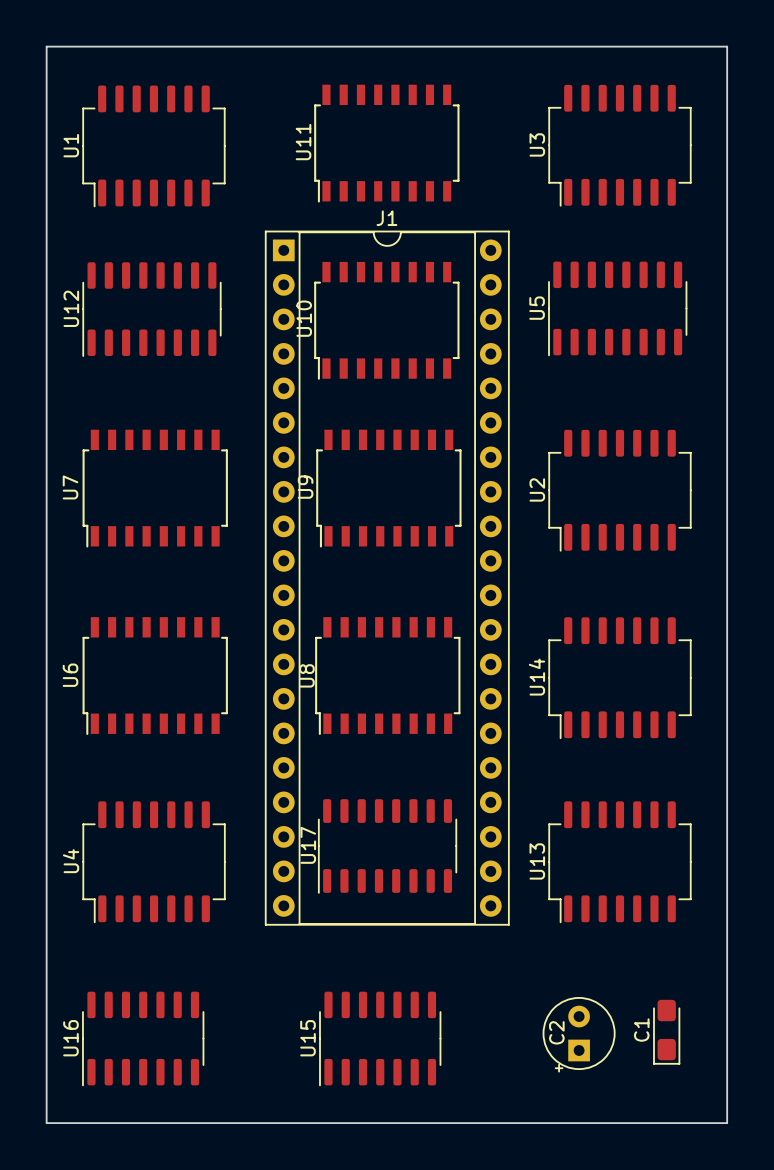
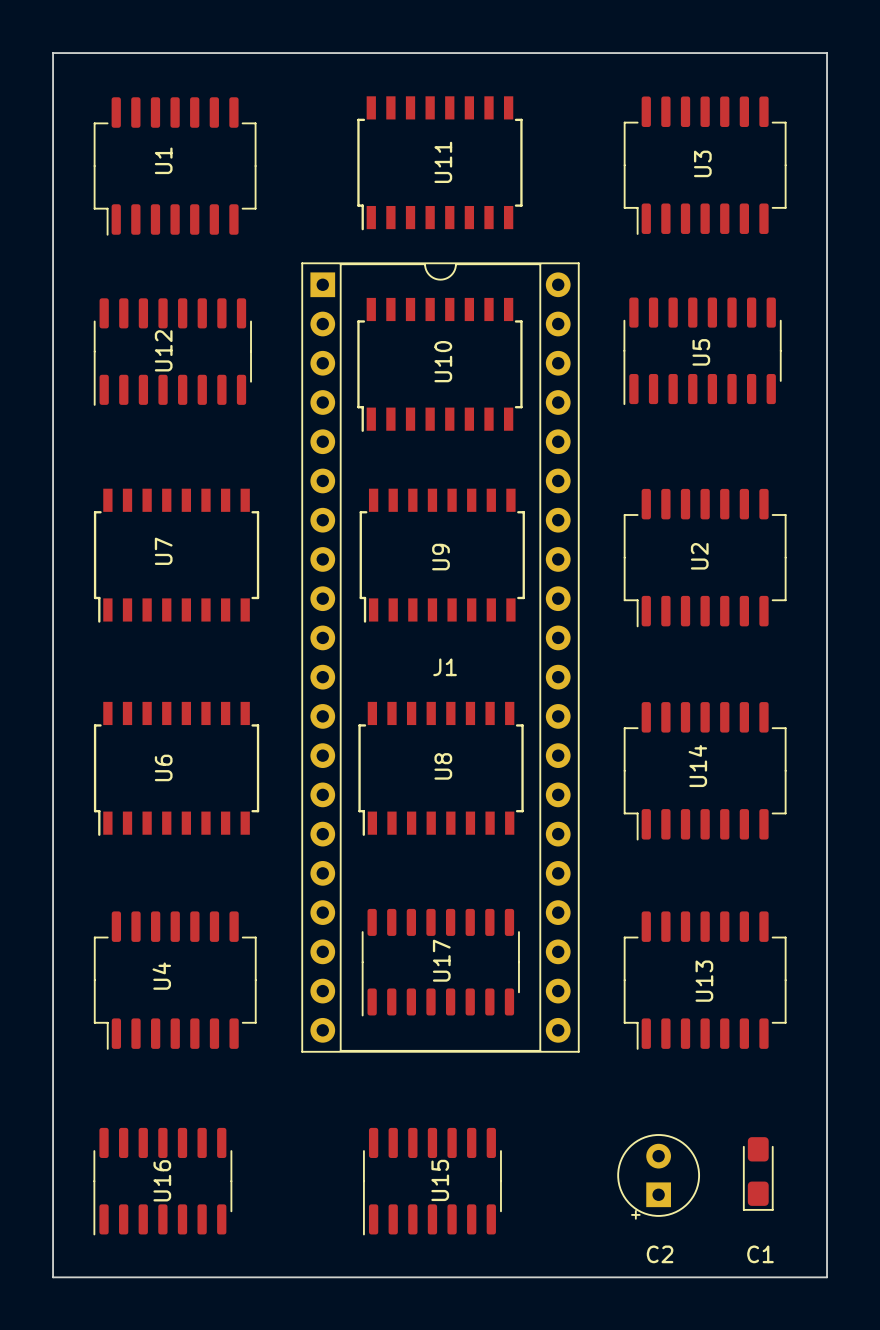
U11 name position: U11 (303, 142) -> U11 (443, 162)
U3 name position: U3 (537, 144) -> U3 (702, 163)
U1 name position: U1 (71, 145) -> U1 (163, 160)
J1 name position: J1 (386, 218) -> J1 (445, 667)
U12 name position: U12 (71, 308) -> U12 (163, 350)
U5 name position: U5 (537, 308) -> U5 (701, 352)
U10 name position: U10 (304, 318) -> U10 (443, 361)
U7 name position: U7 (70, 487) -> U7 (163, 551)
U9 name position: U9 (305, 487) -> U9 (440, 557)
U2 name position: U2 (537, 489) -> U2 (699, 556)
U6 name position: U6 (70, 675) -> U6 (163, 767)
U8 name position: U8 (306, 675) -> U8 (443, 766)
U14 name position: U14 (536, 677) -> U14 (697, 766)
U17 name position: U17 (308, 845) -> U17 (441, 960)
U4 name position: U4 (71, 861) -> U4 (161, 976)
U13 name position: U13 (537, 861) -> U13 (704, 981)
C1 name rotation: 0° (641, 1030) -> 90° clockwise (760, 1254)
C1 name position: C1 (641, 1030) -> C1 (760, 1254)
C2 name rotation: 0° (556, 1032) -> 90° clockwise (660, 1254)
C2 name position: C2 (556, 1032) -> C2 (660, 1254)
U16 name position: U16 (70, 1038) -> U16 (162, 1180)
U15 name position: U15 (308, 1038) -> U15 (440, 1180)

